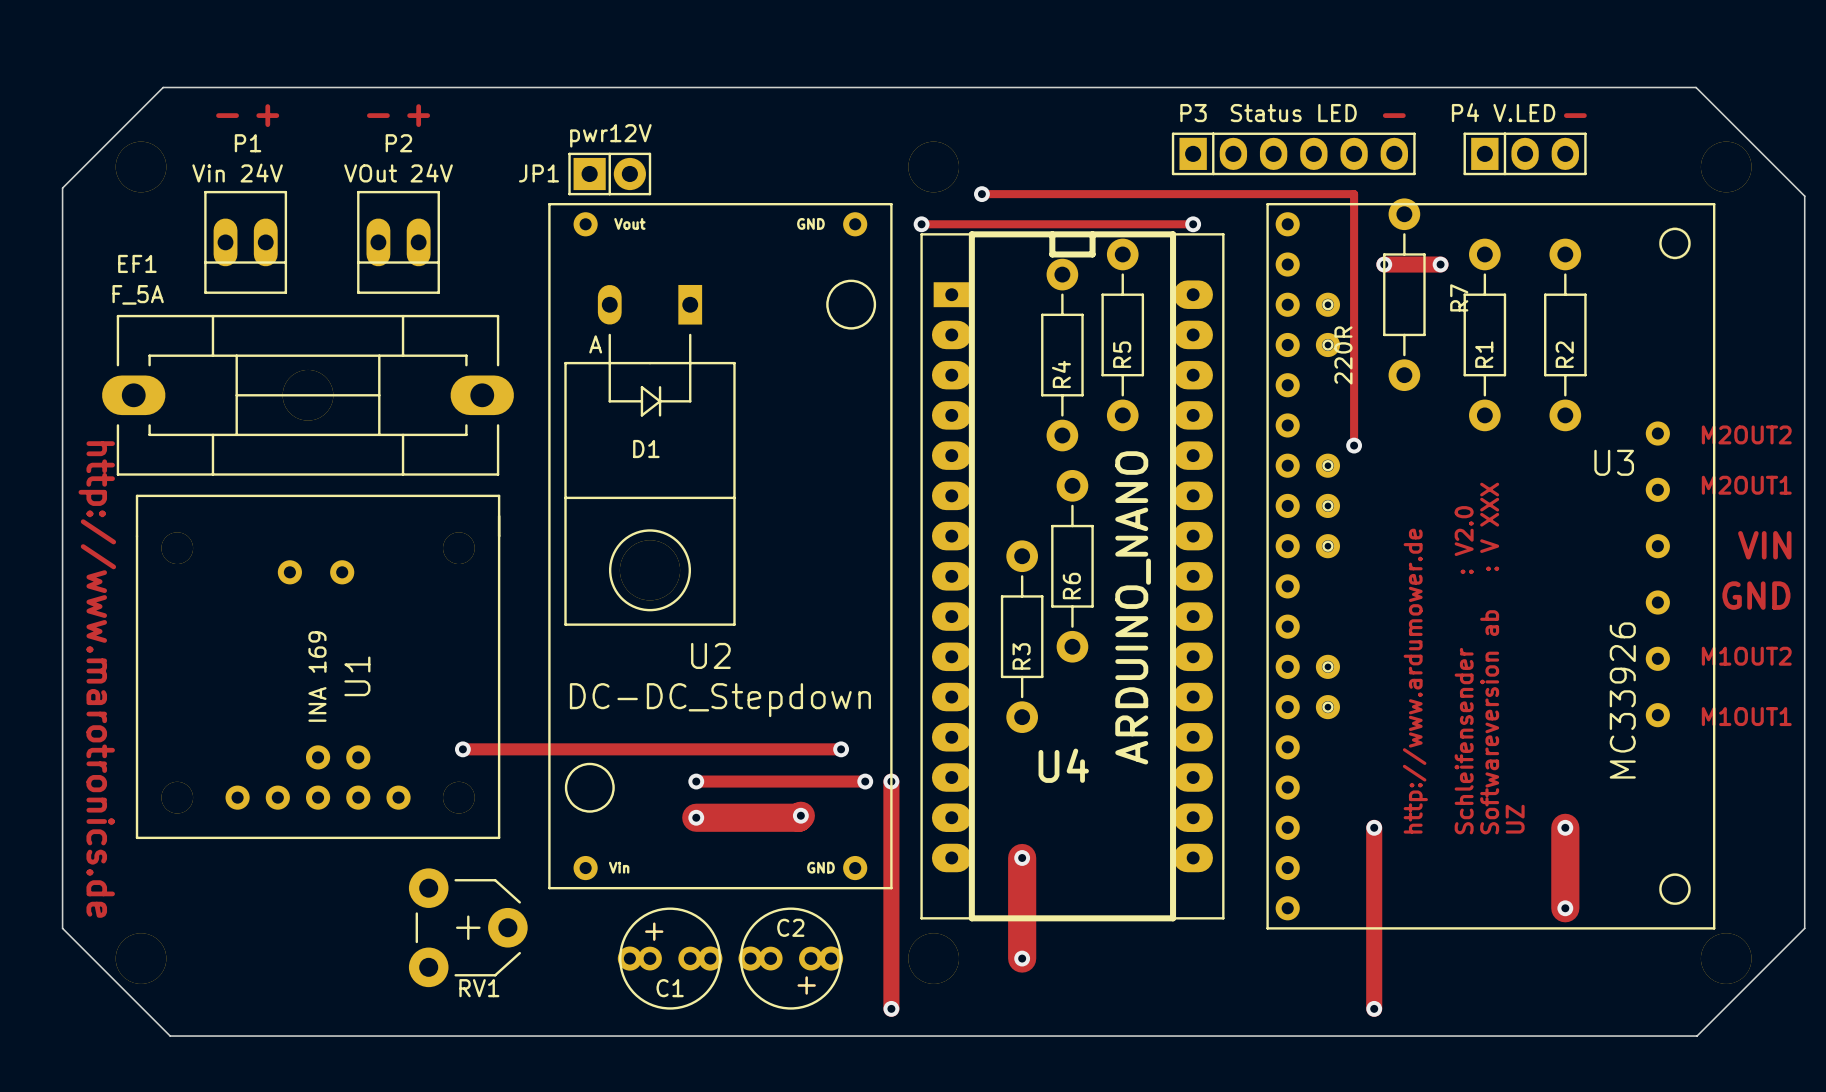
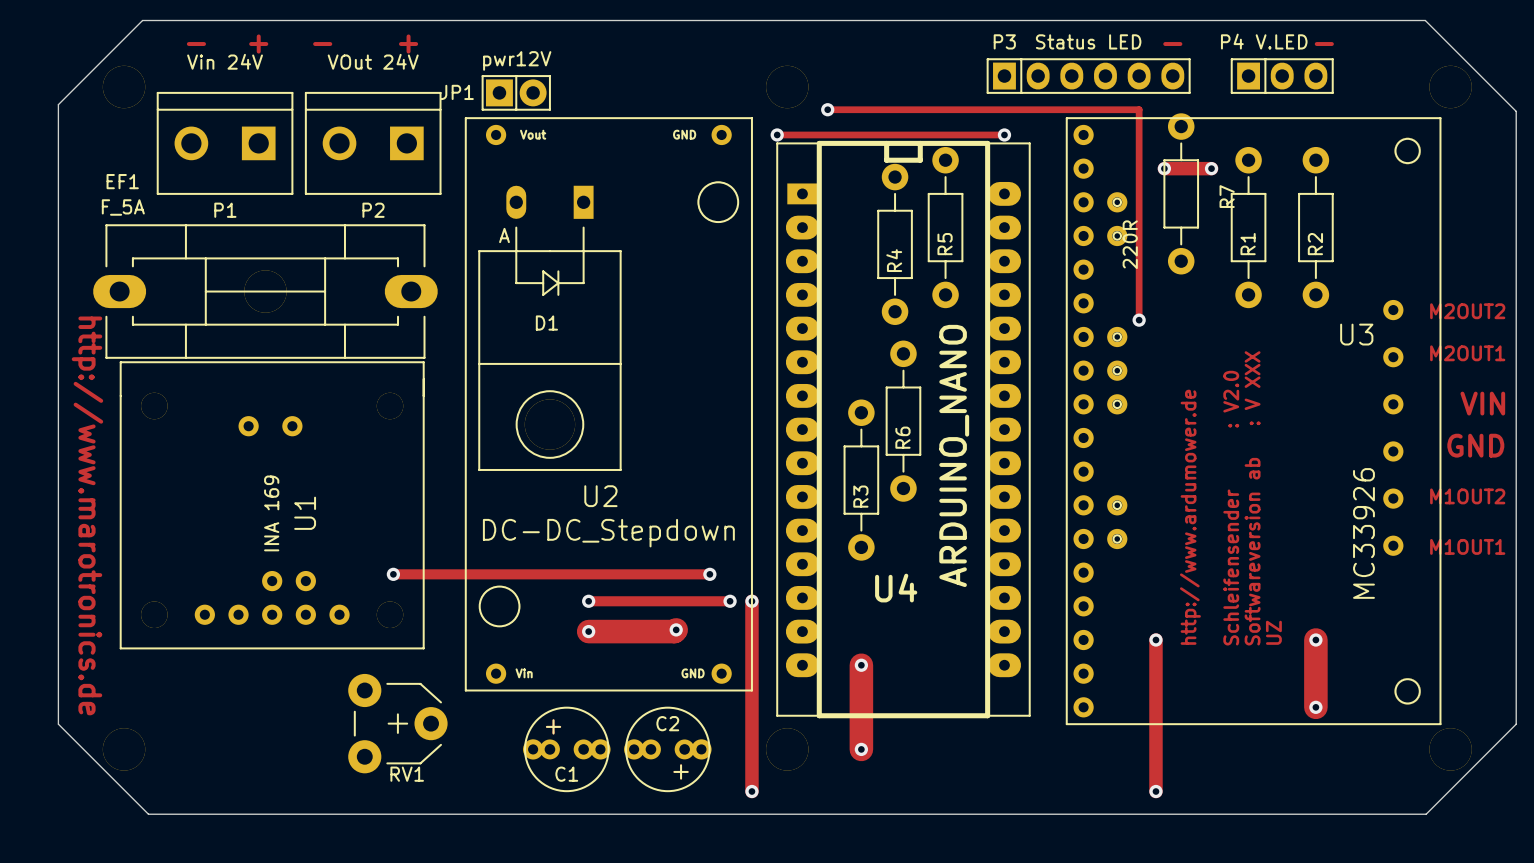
text position: + (267, 115) -> + (258, 44)
text: + (418, 115) -> none
text: none -> + (408, 44)
P1 name position: P1 (248, 143) -> P1 (225, 210)
P2 name position: P2 (398, 143) -> P2 (373, 210)
P1 footprint: [204, 190, 288, 294] -> [156, 91, 294, 195]
P2 footprint: [357, 190, 440, 294] -> [304, 91, 442, 195]
EF1 position: (308, 395) -> (265, 291)

